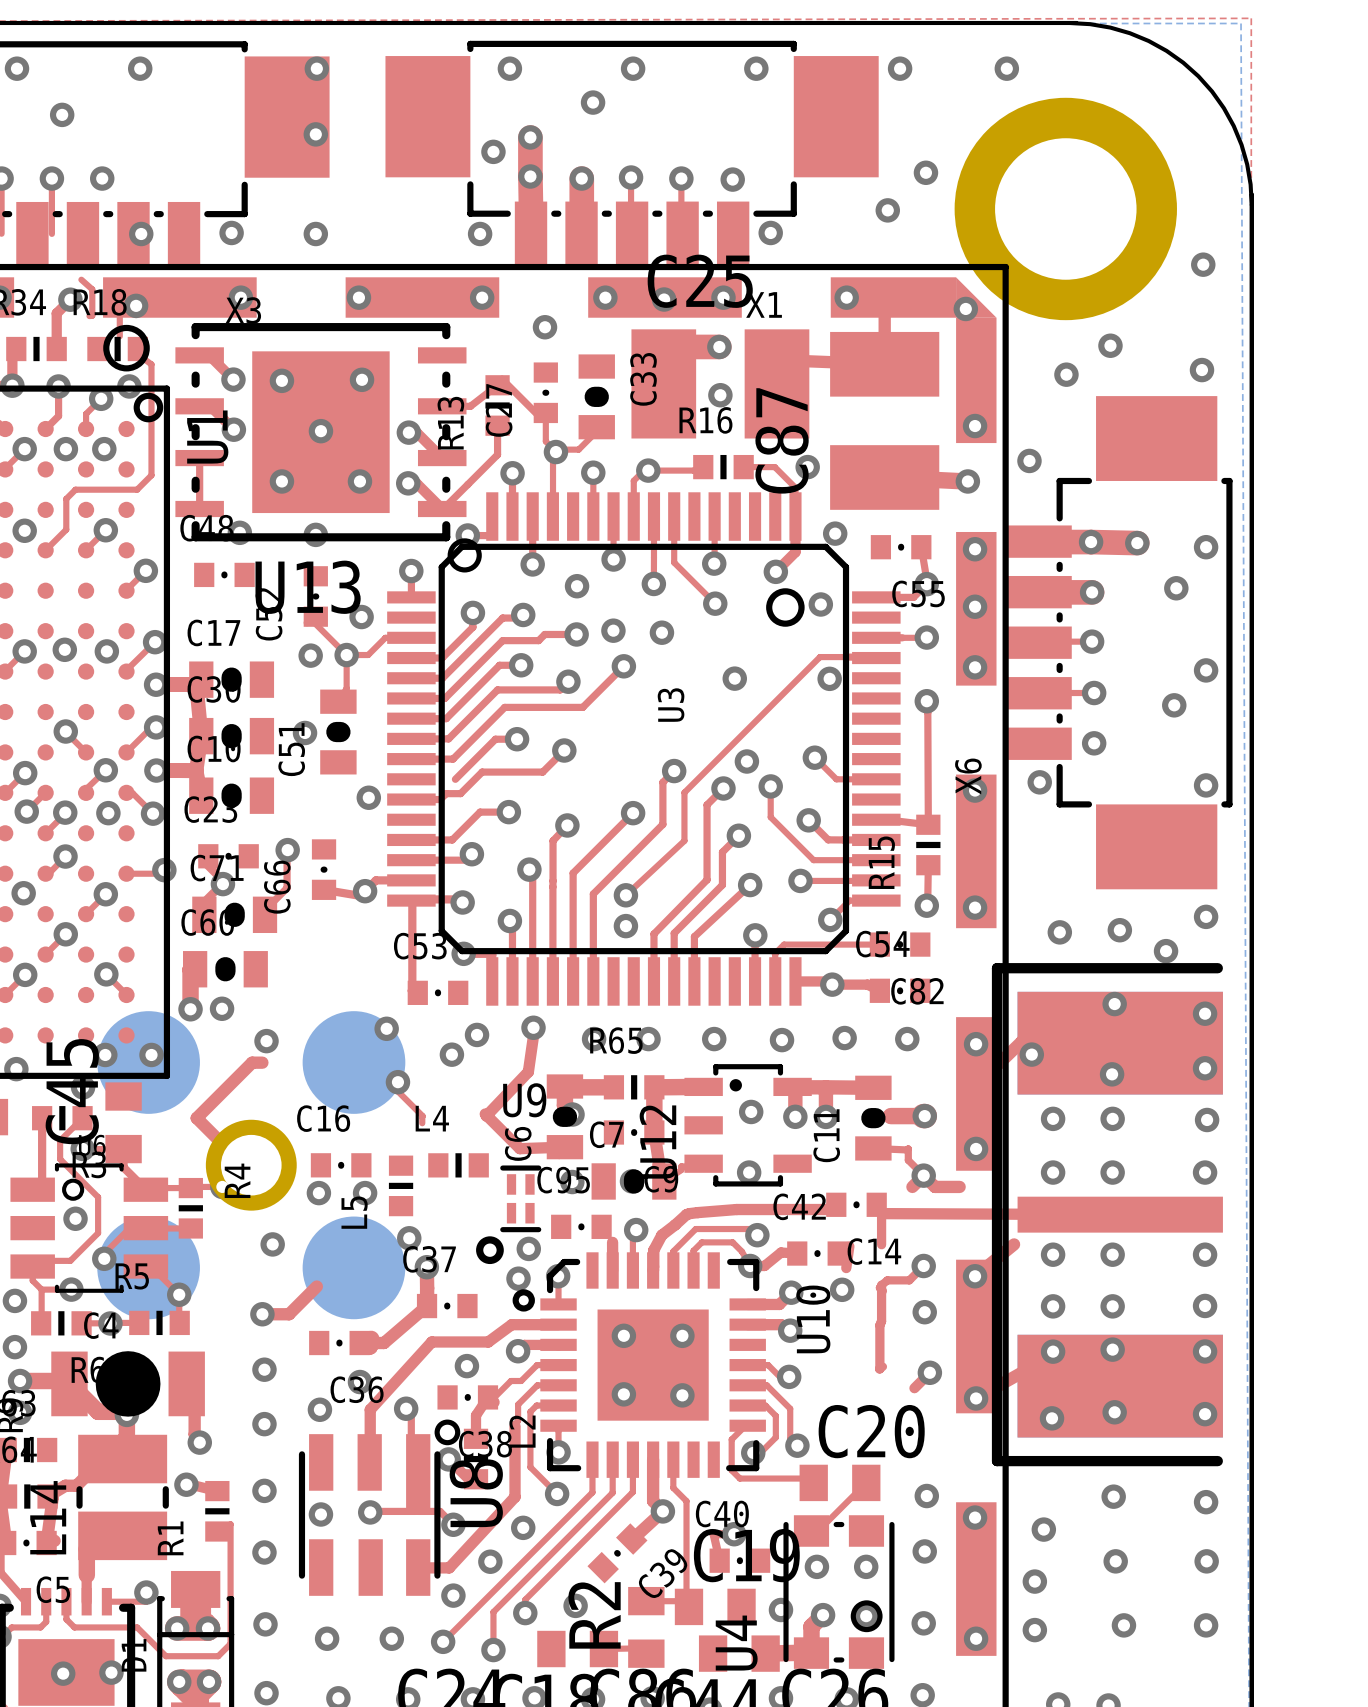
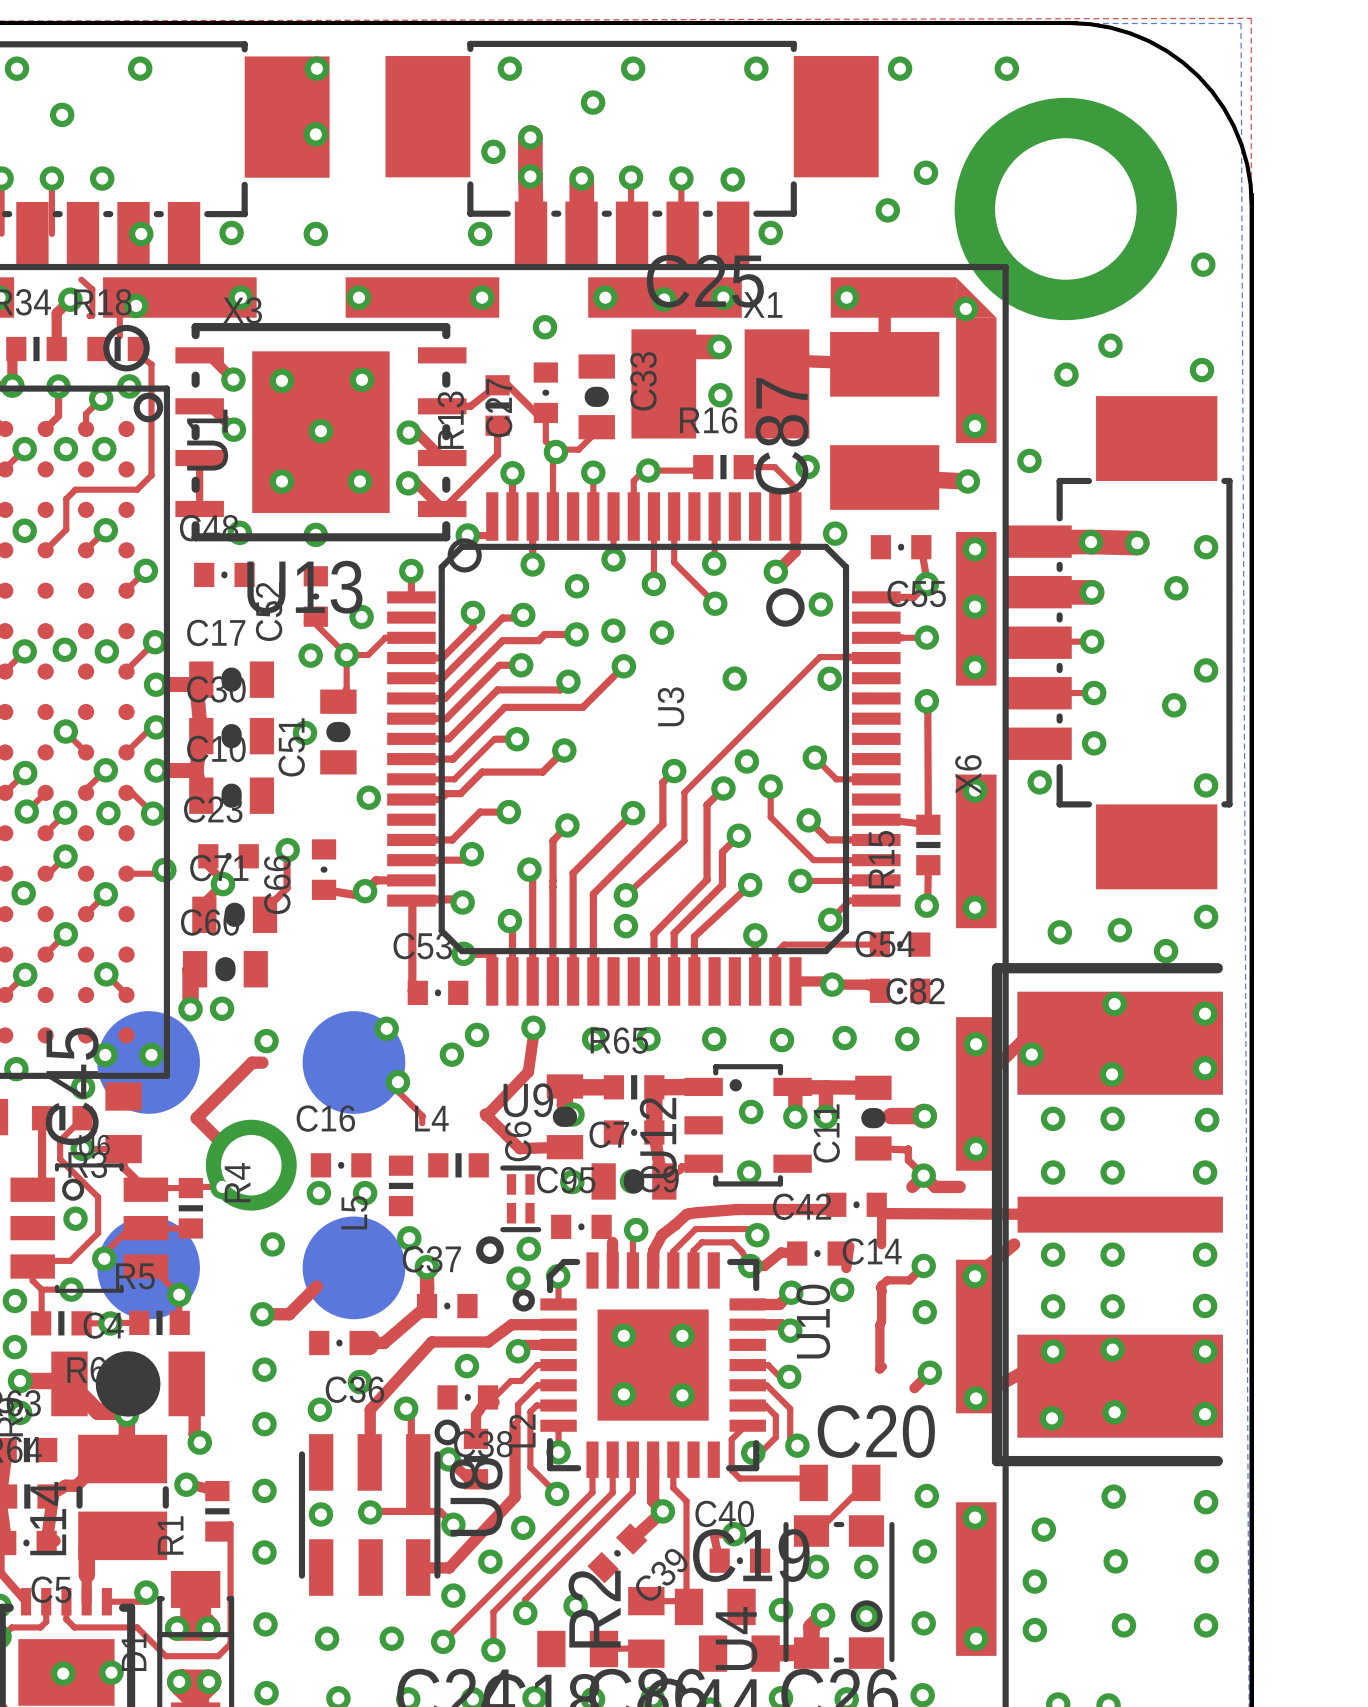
top track: (495, 739) (455, 779) -> (495, 739) (454, 779) (411, 779)

